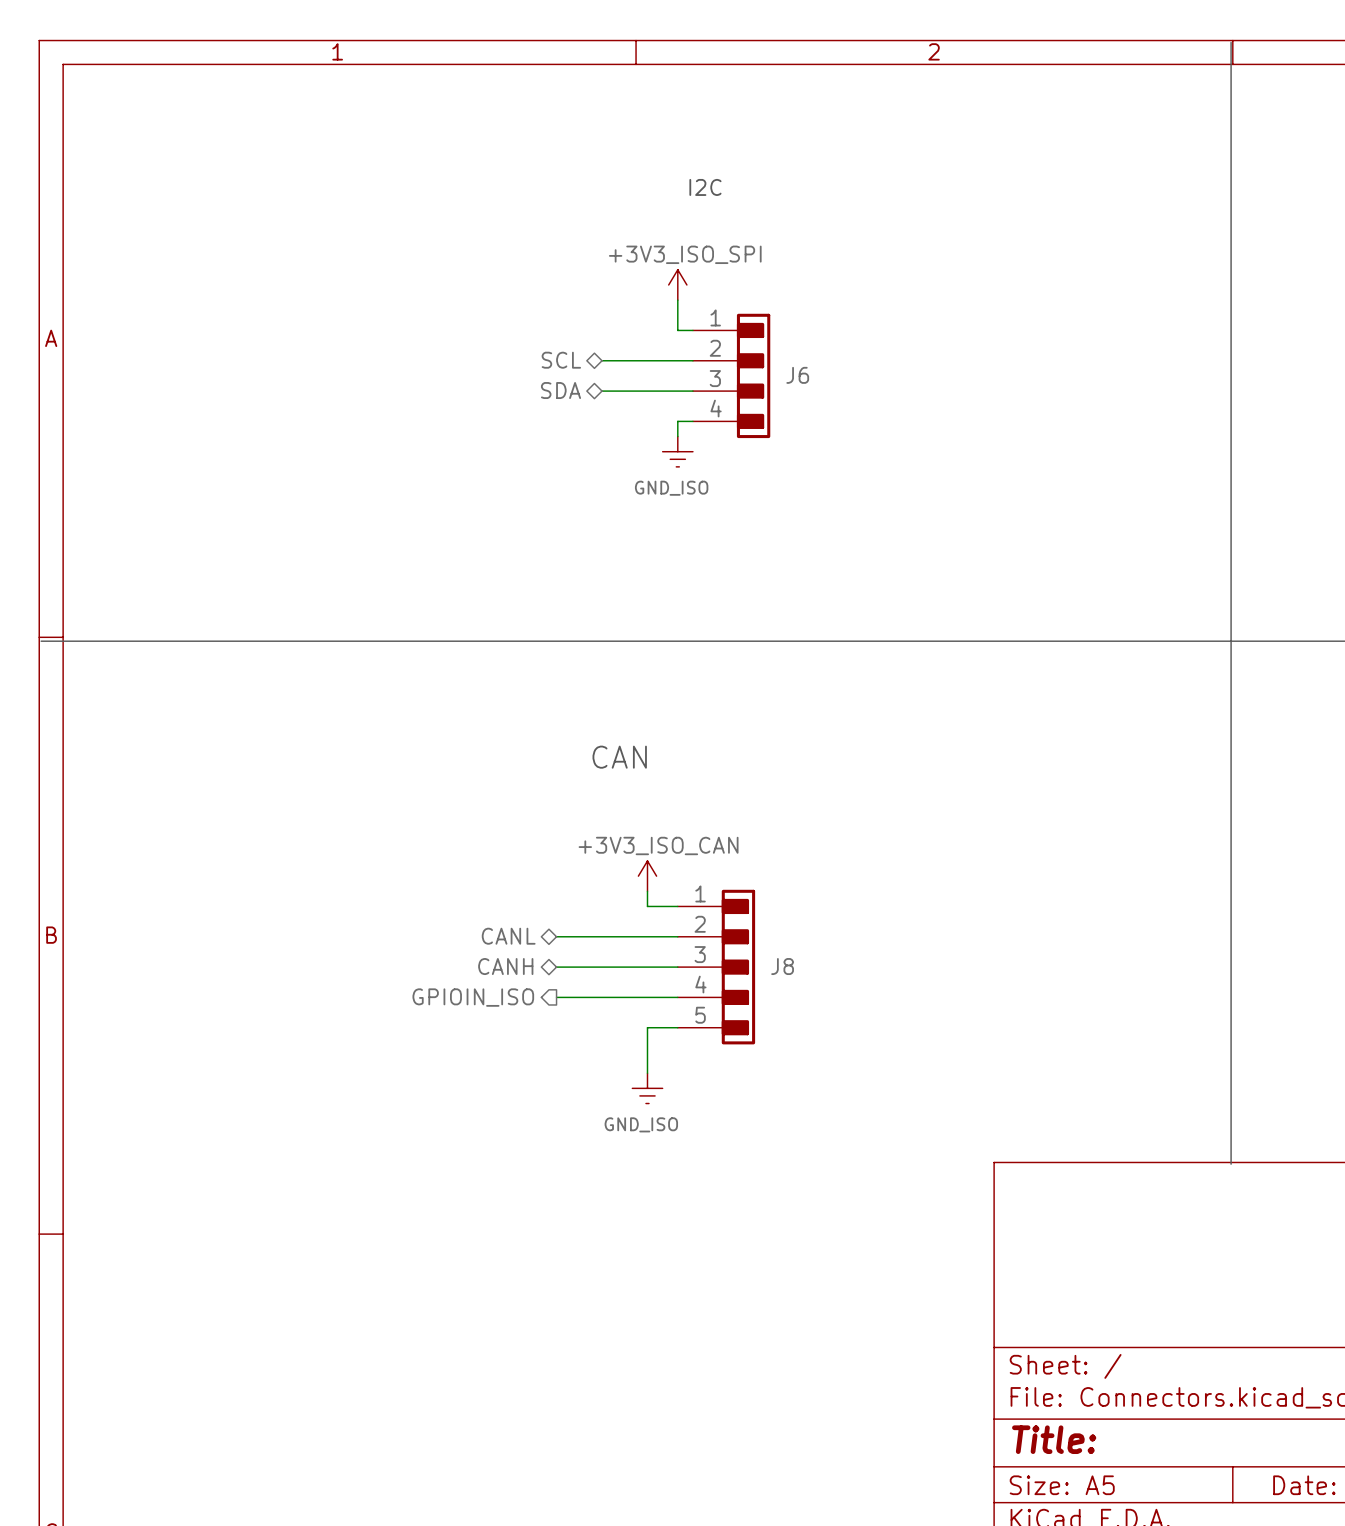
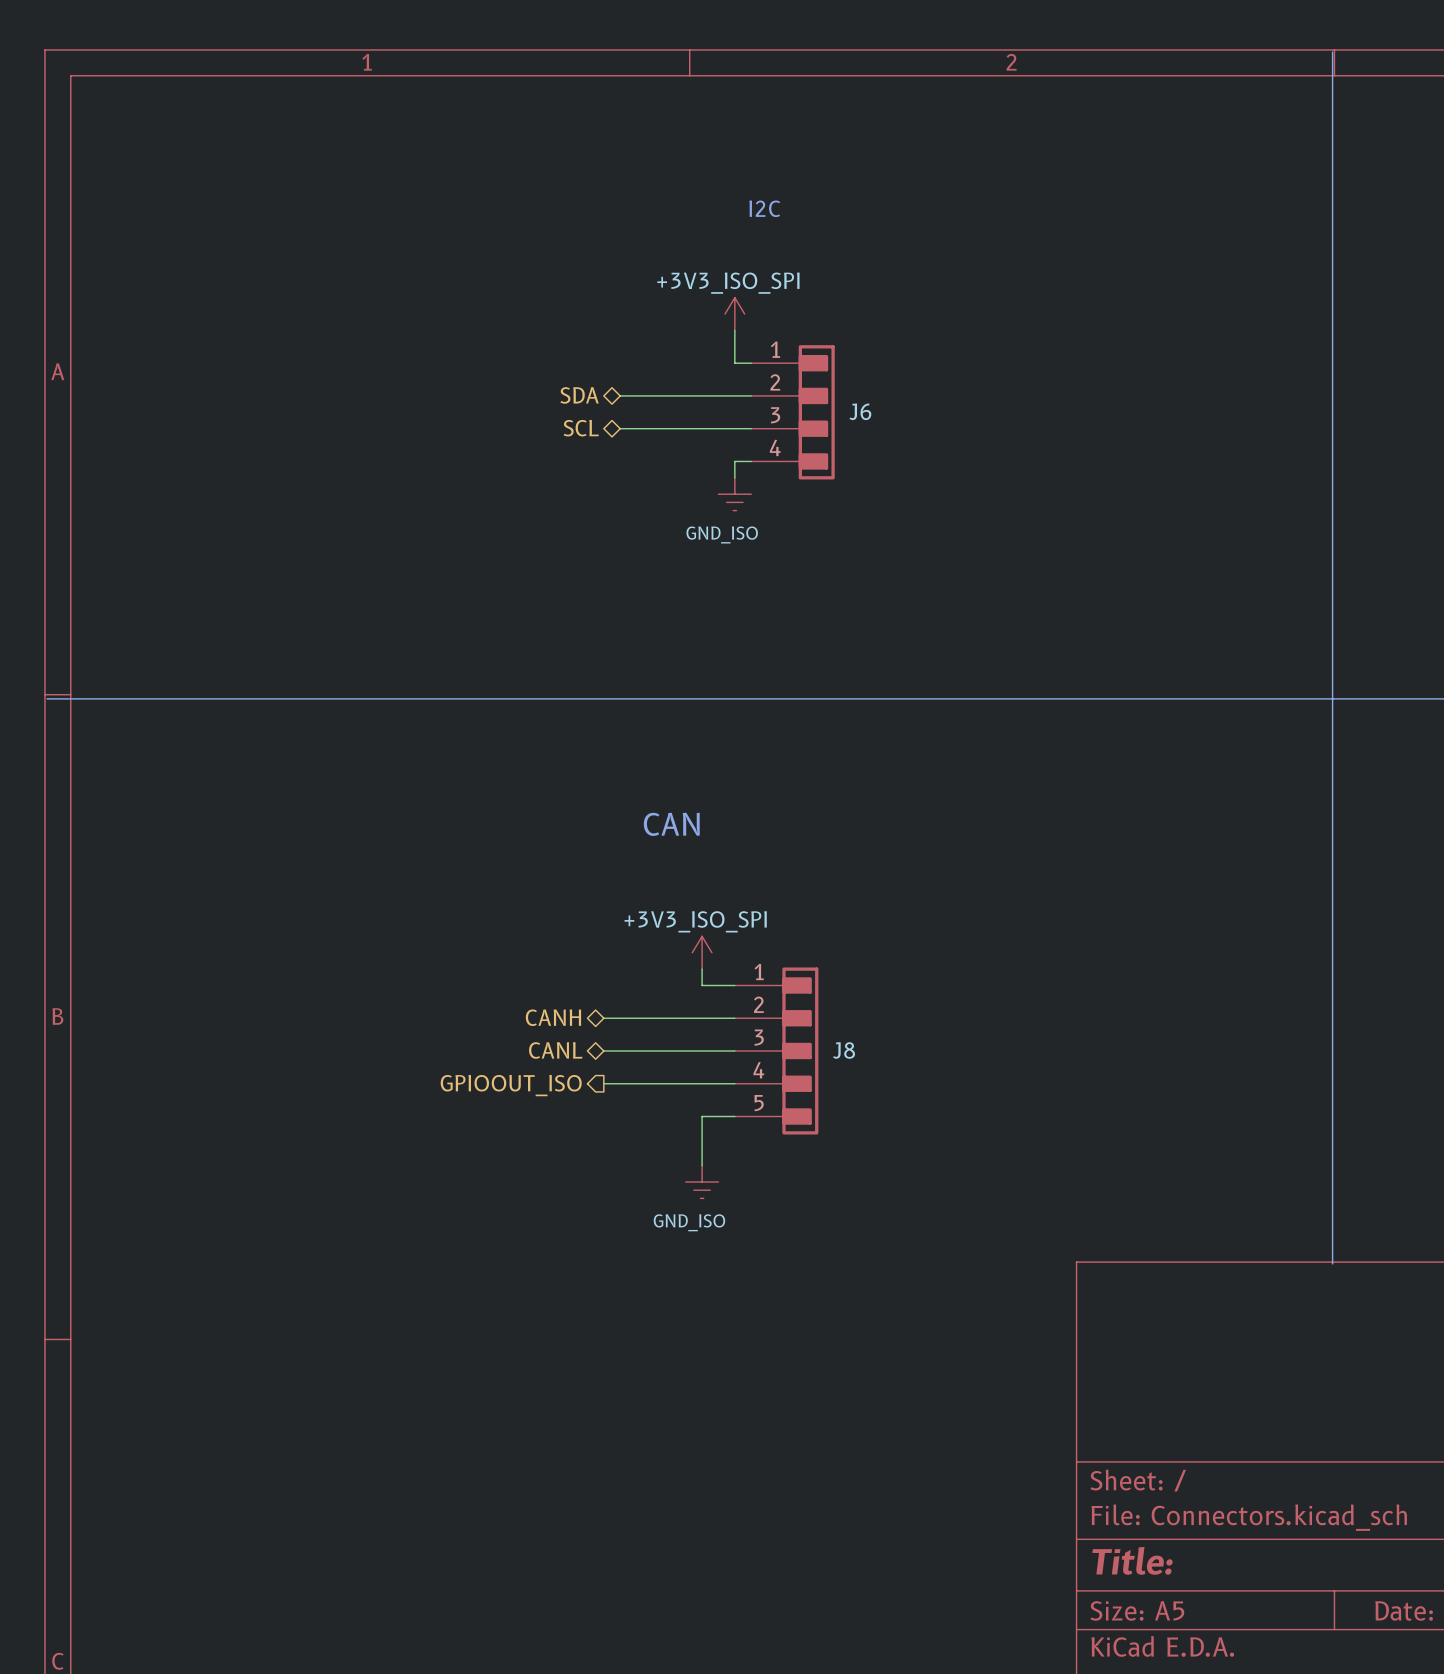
hierarchical label position: SCL (561, 360) -> SCL (581, 428)
wire: none -> (620, 395) (652, 395)
hierarchical label position: SDA (560, 390) -> SDA (579, 395)
wire: none -> (620, 428) (652, 428)
power symbol: +3V3_ISO_CAN (647, 876) -> +3V3_ISO_SPI (702, 952)
hierarchical label: CANL (508, 936) -> CANH (553, 1017)
hierarchical label: CANH (505, 966) -> CANL (555, 1050)
hierarchical label: GPIOIN_ISO (473, 997) -> GPIOOUT_ISO (511, 1085)

